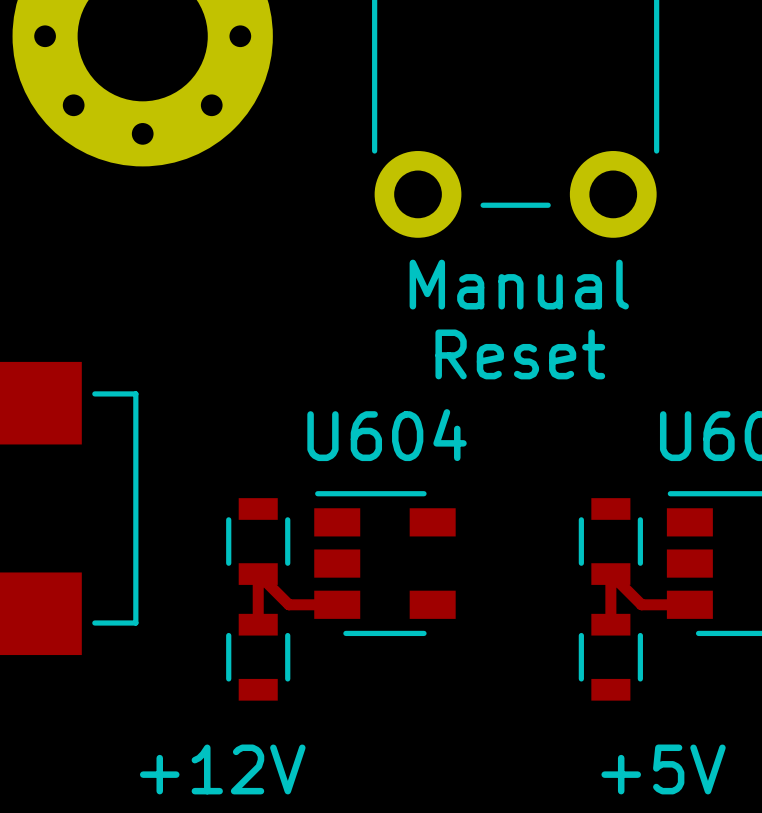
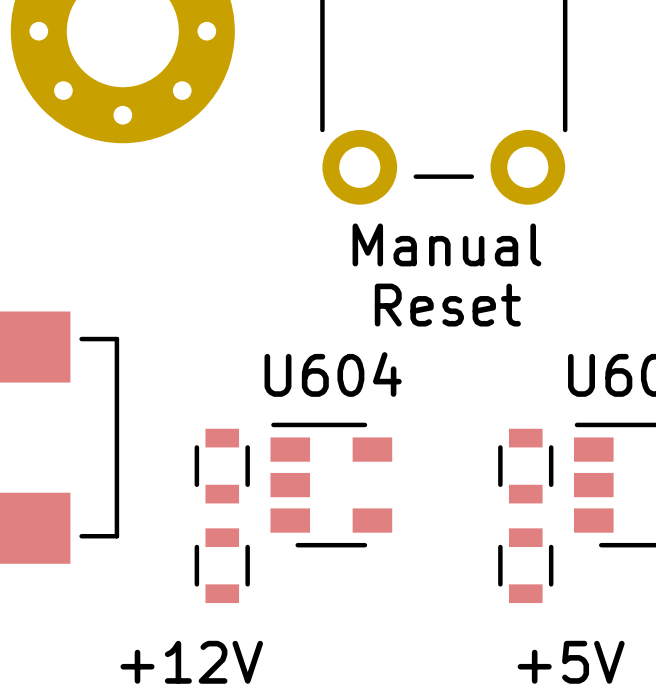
track: (337, 604) (288, 604) (258, 574) (258, 624) -> none
track: (689, 604) (641, 604) (610, 574) (610, 624) -> none

